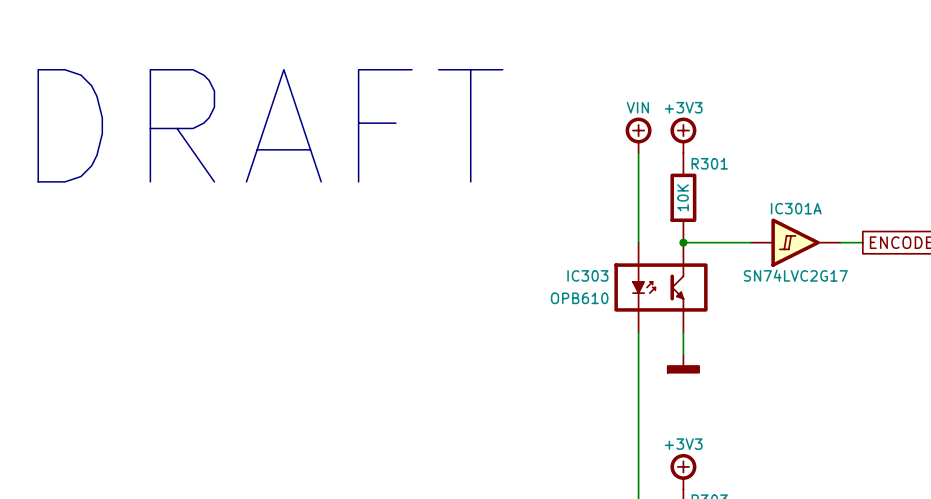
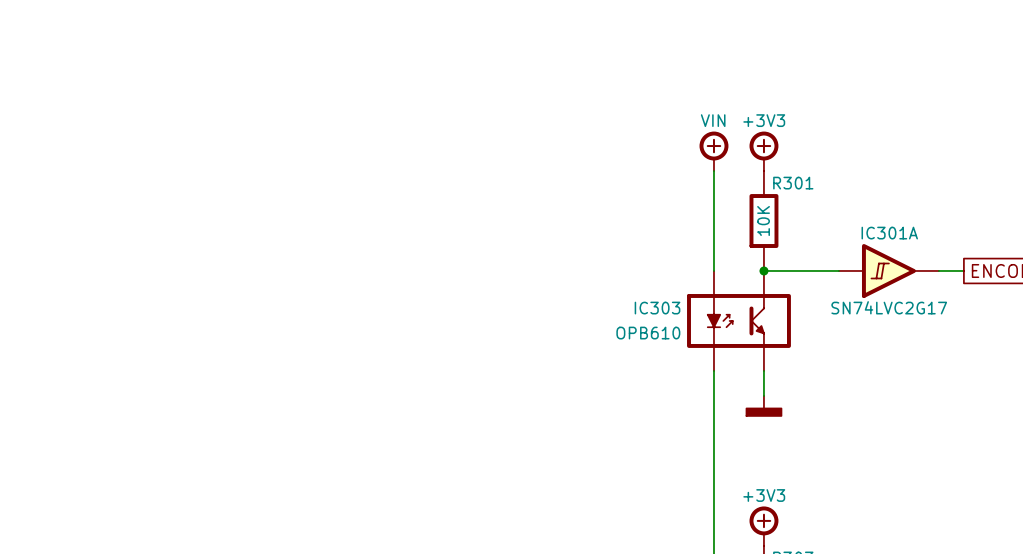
text: DRAFT (270, 125) -> none

